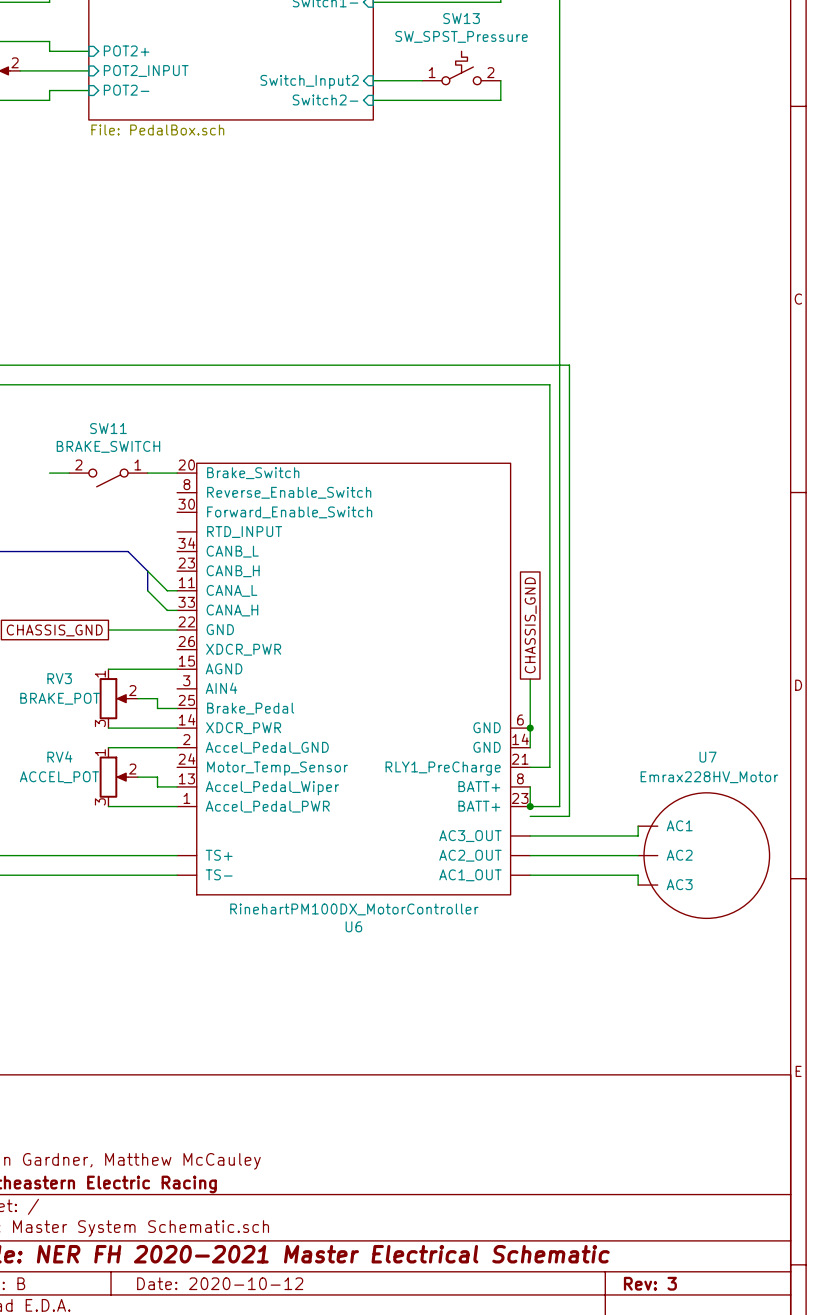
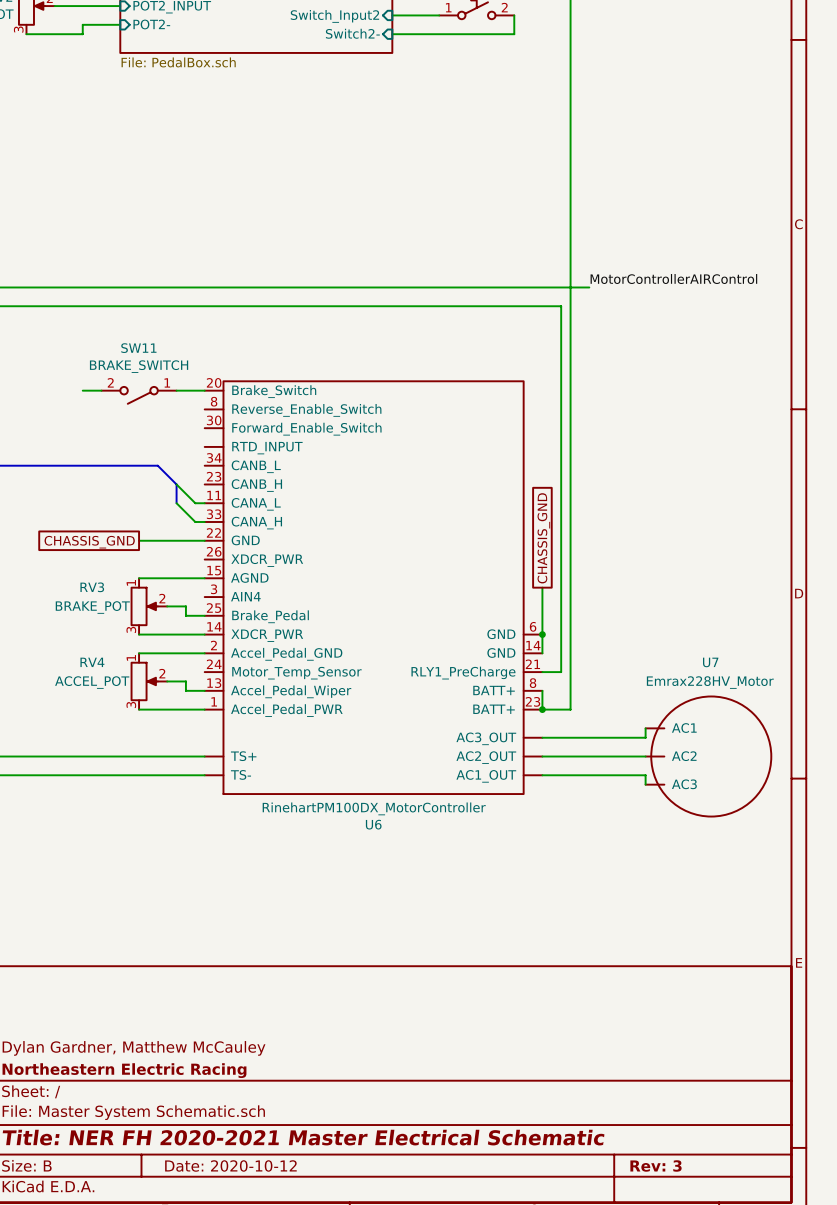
label: none -> MotorControllerAIRControl (673, 279)
wire: (569, 365) (569, 816) (530, 816) -> (579, 287) (589, 287)

